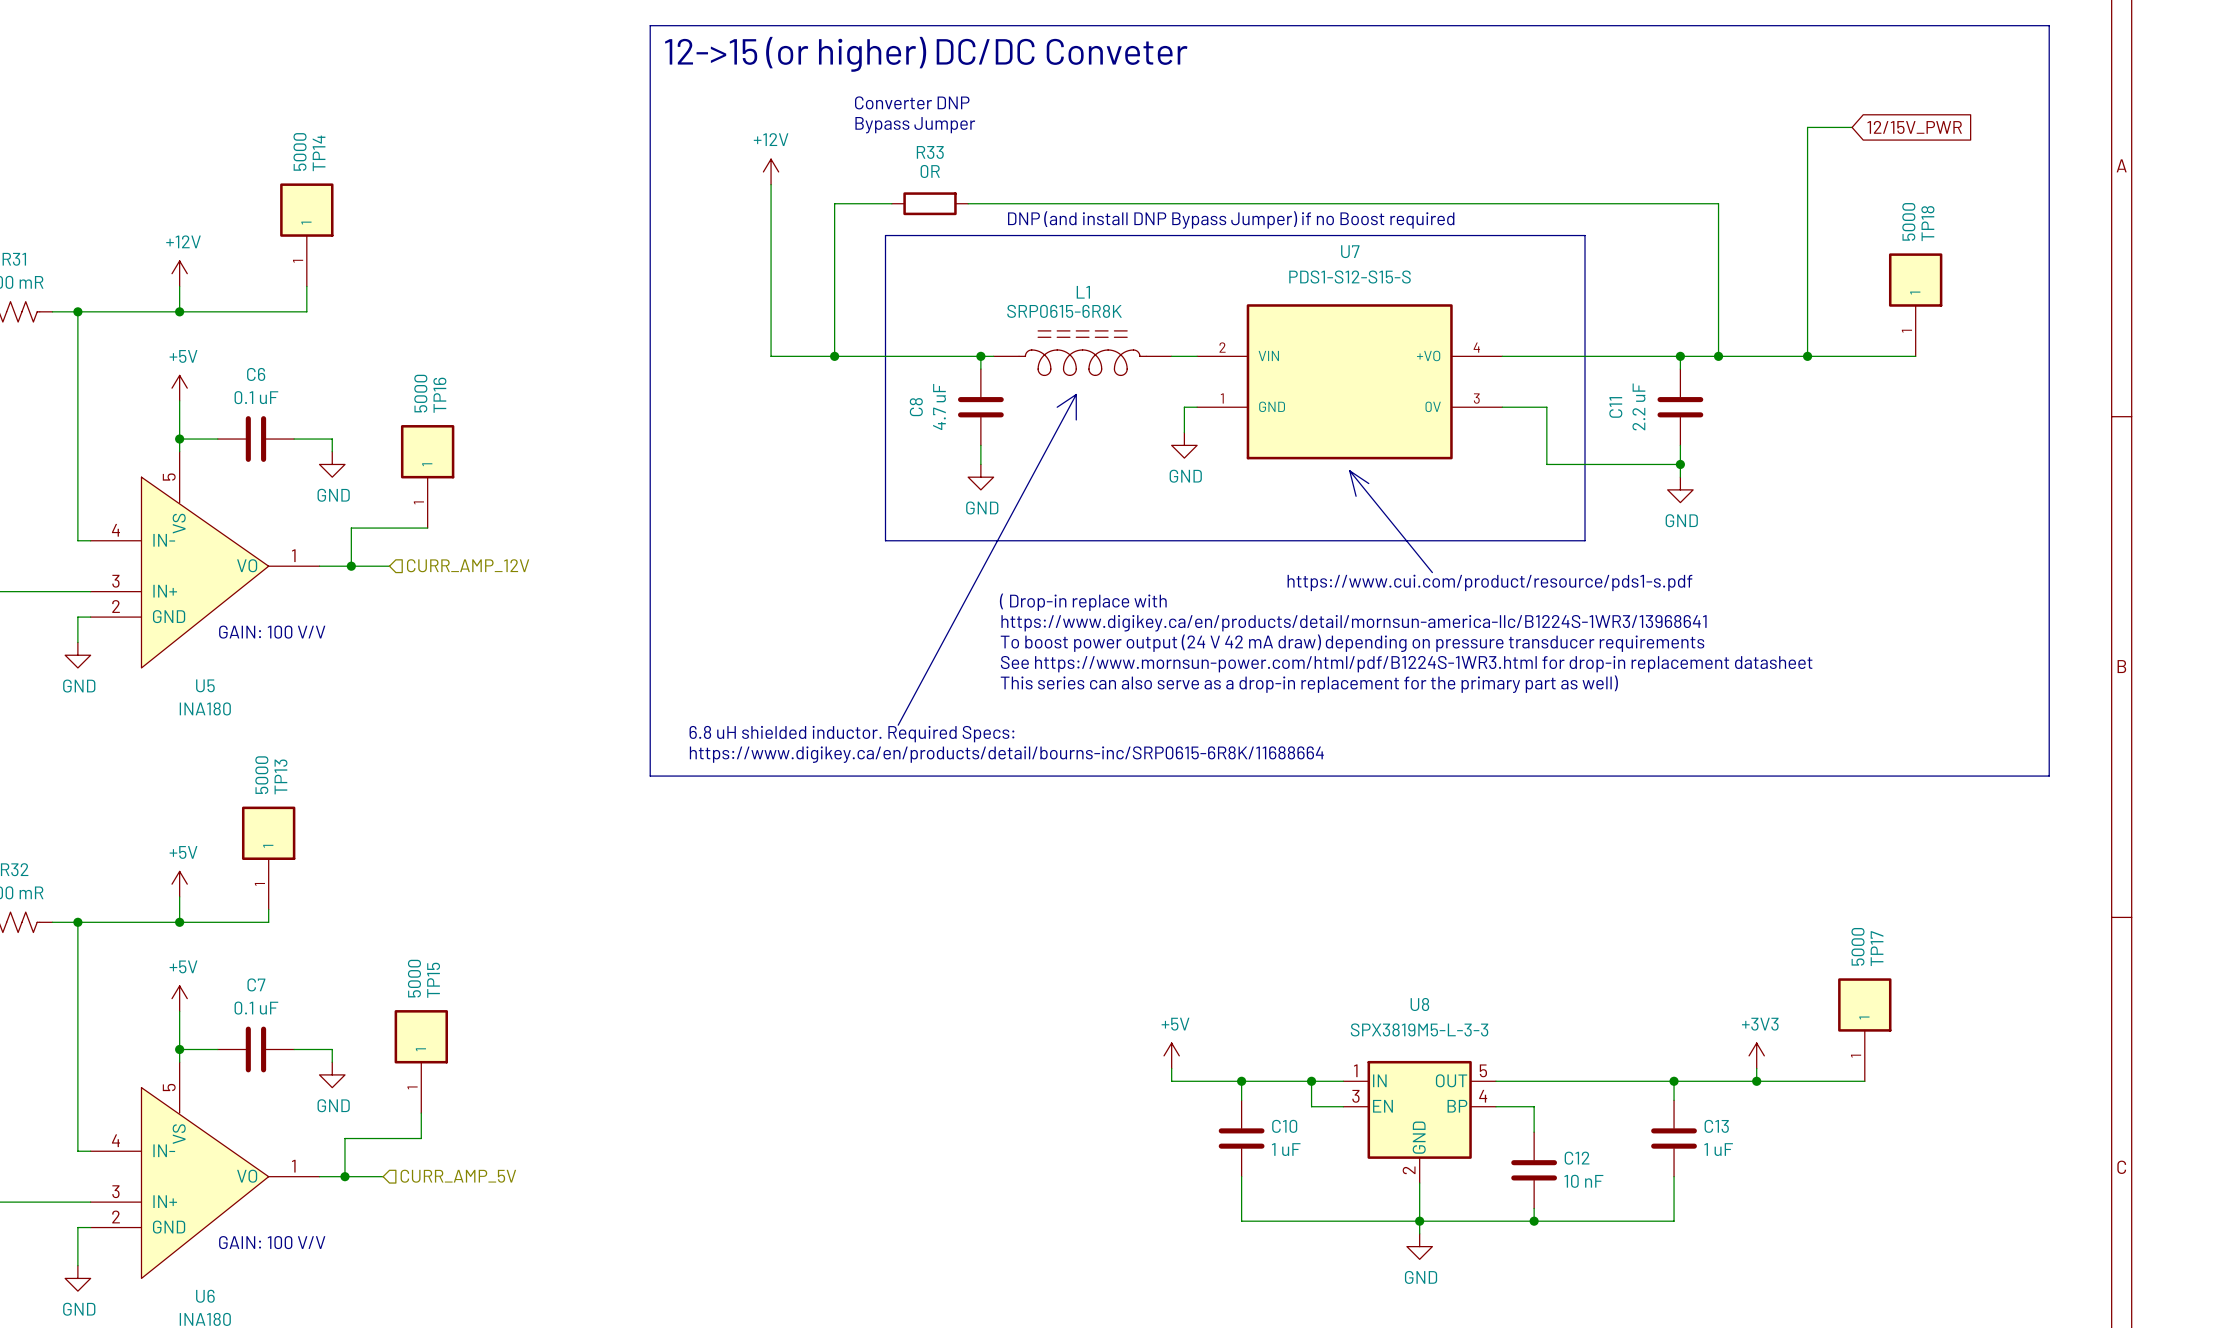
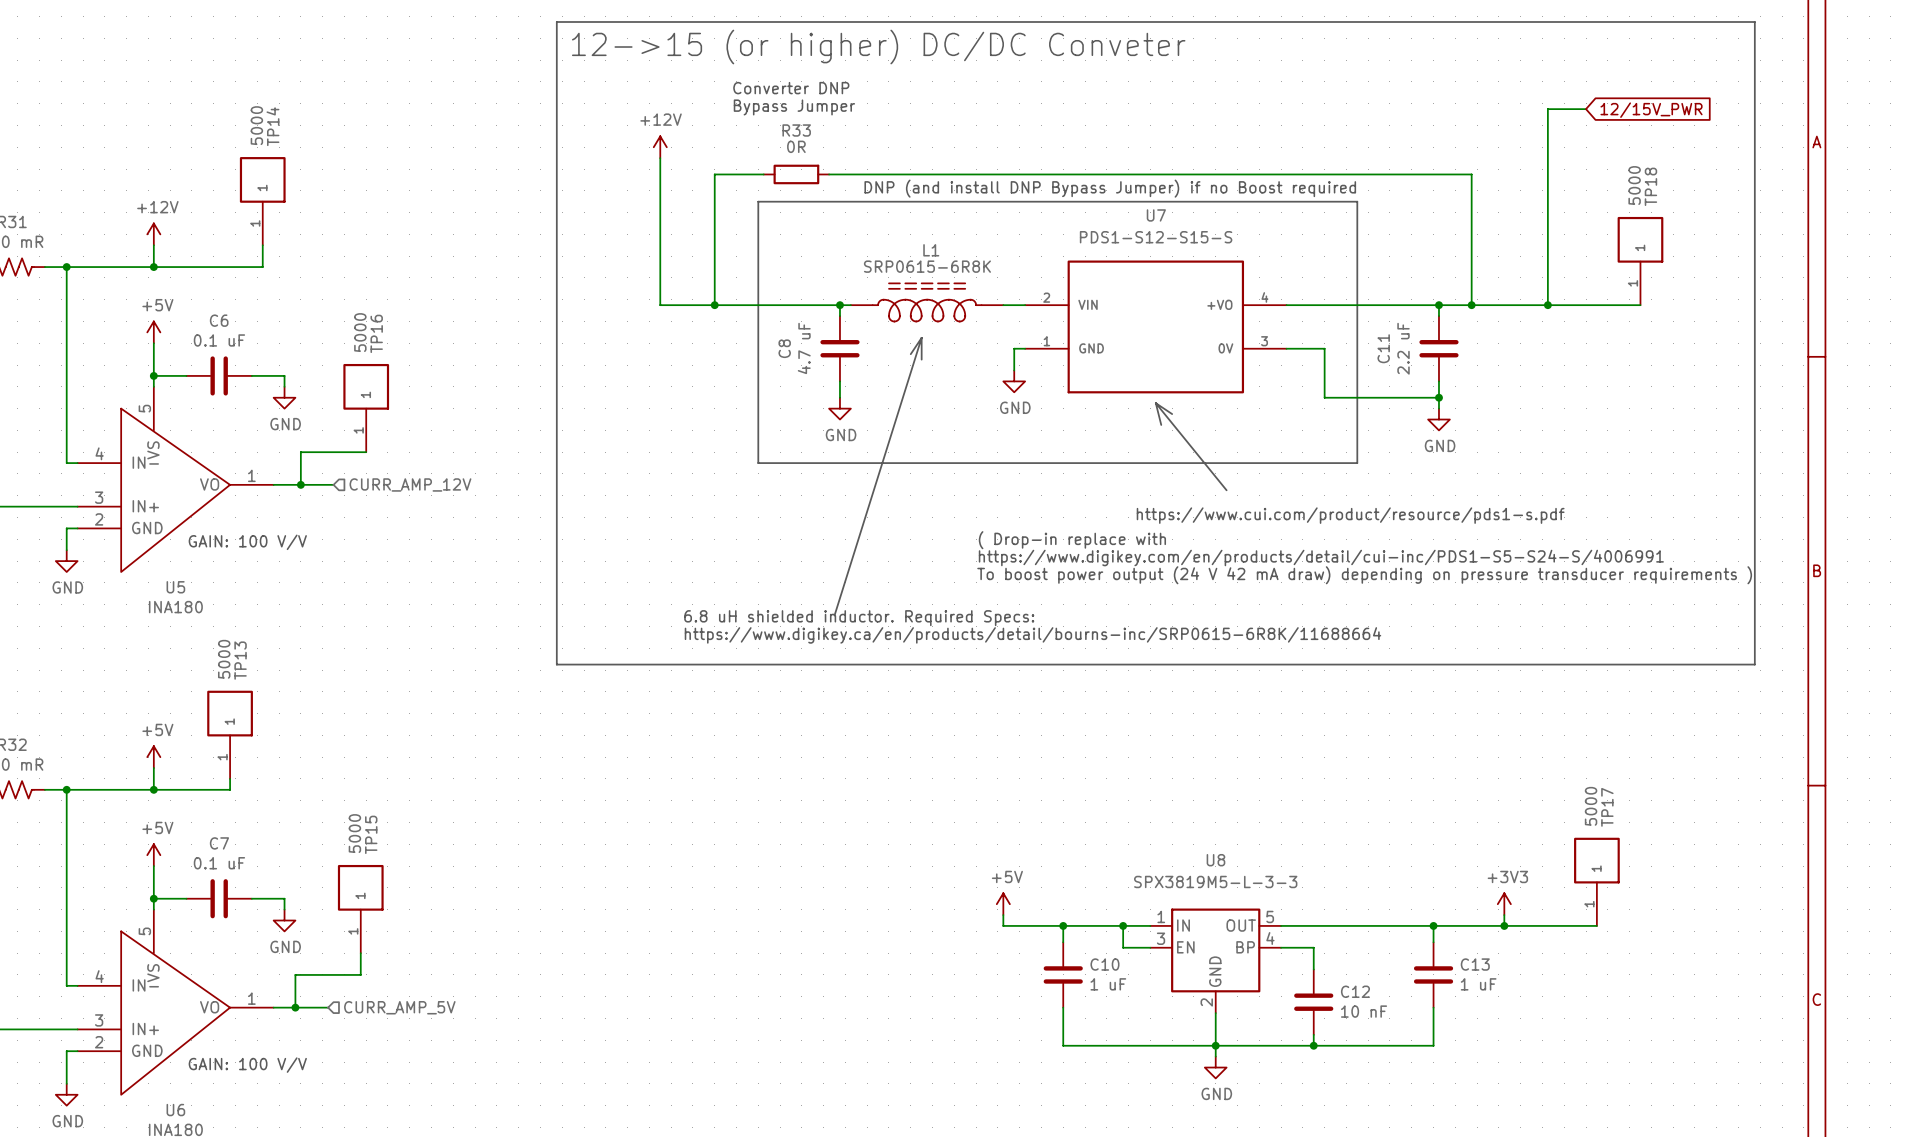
line: (1057, 407) (1076, 394) (898, 725) -> none
line: none -> (910, 354) (921, 337) (834, 615)
text position: https://www.cui.com/product/resource/pds1-s.pdf (1489, 582) -> https://www.cui.com/product/resource/pds1-s.pdf (1350, 515)
text position: ( Drop-in replace with (1083, 602) -> ( Drop-in replace with (1072, 540)
text: https://www.digikey.ca/en/products/detail/mornsun-america-llc/B1224S-1WR3/13968641 (1354, 623) -> none
text: To boost power output (24 V 42 mA draw) depending on pressure transducer requirements (1352, 643) -> none
text: none -> https://www.digikey.com/en/products/detail/cui-inc/PDS1-S5-S24-S/4006991 (1321, 557)
text: See https://www.mornsun-power.com/html/pdf/B1224S-1WR3.html for drop-in replacement datasheet (1406, 664) -> none
text: none -> To boost power output (24 V 42 mA draw) depending on pressure transducer requirements ) (1364, 575)
text: This series can also serve as a drop-in replacement for the primary part as well) (1309, 684) -> none
text position: 6.8 uH shielded inductor. Required Specs: (851, 734) -> 6.8 uH shielded inductor. Required Specs: (859, 618)
text position: https://www.digikey.ca/en/products/detail/bourns-inc/SRP0615-6R8K/11688664 (1006, 754) -> https://www.digikey.ca/en/products/detail/bourns-inc/SRP0615-6R8K/11688664 (1032, 635)

